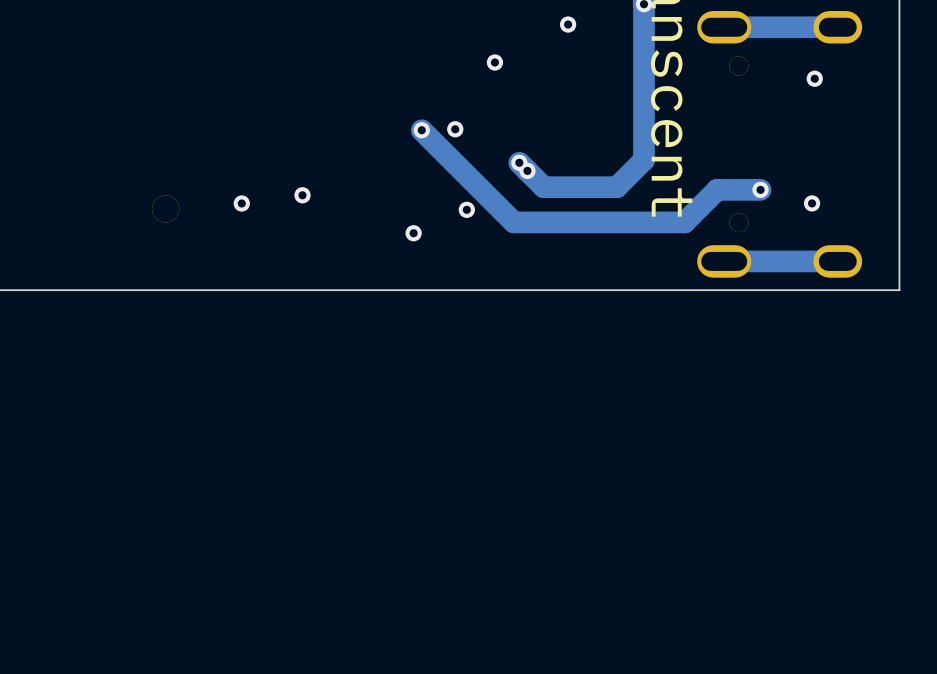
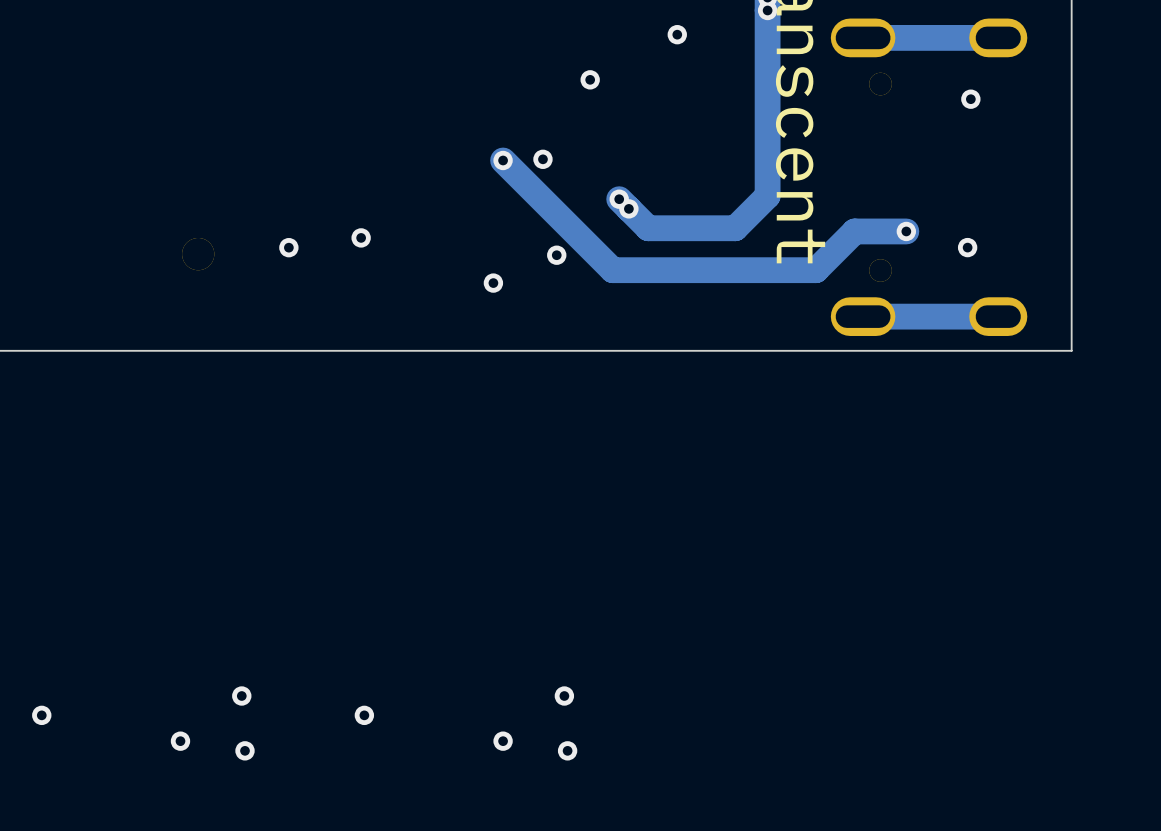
via: none -> (241, 696)
via: none -> (564, 696)
via: none -> (41, 715)
via: none -> (364, 715)
via: none -> (180, 741)
via: none -> (503, 741)
via: none -> (245, 750)
via: none -> (567, 750)

